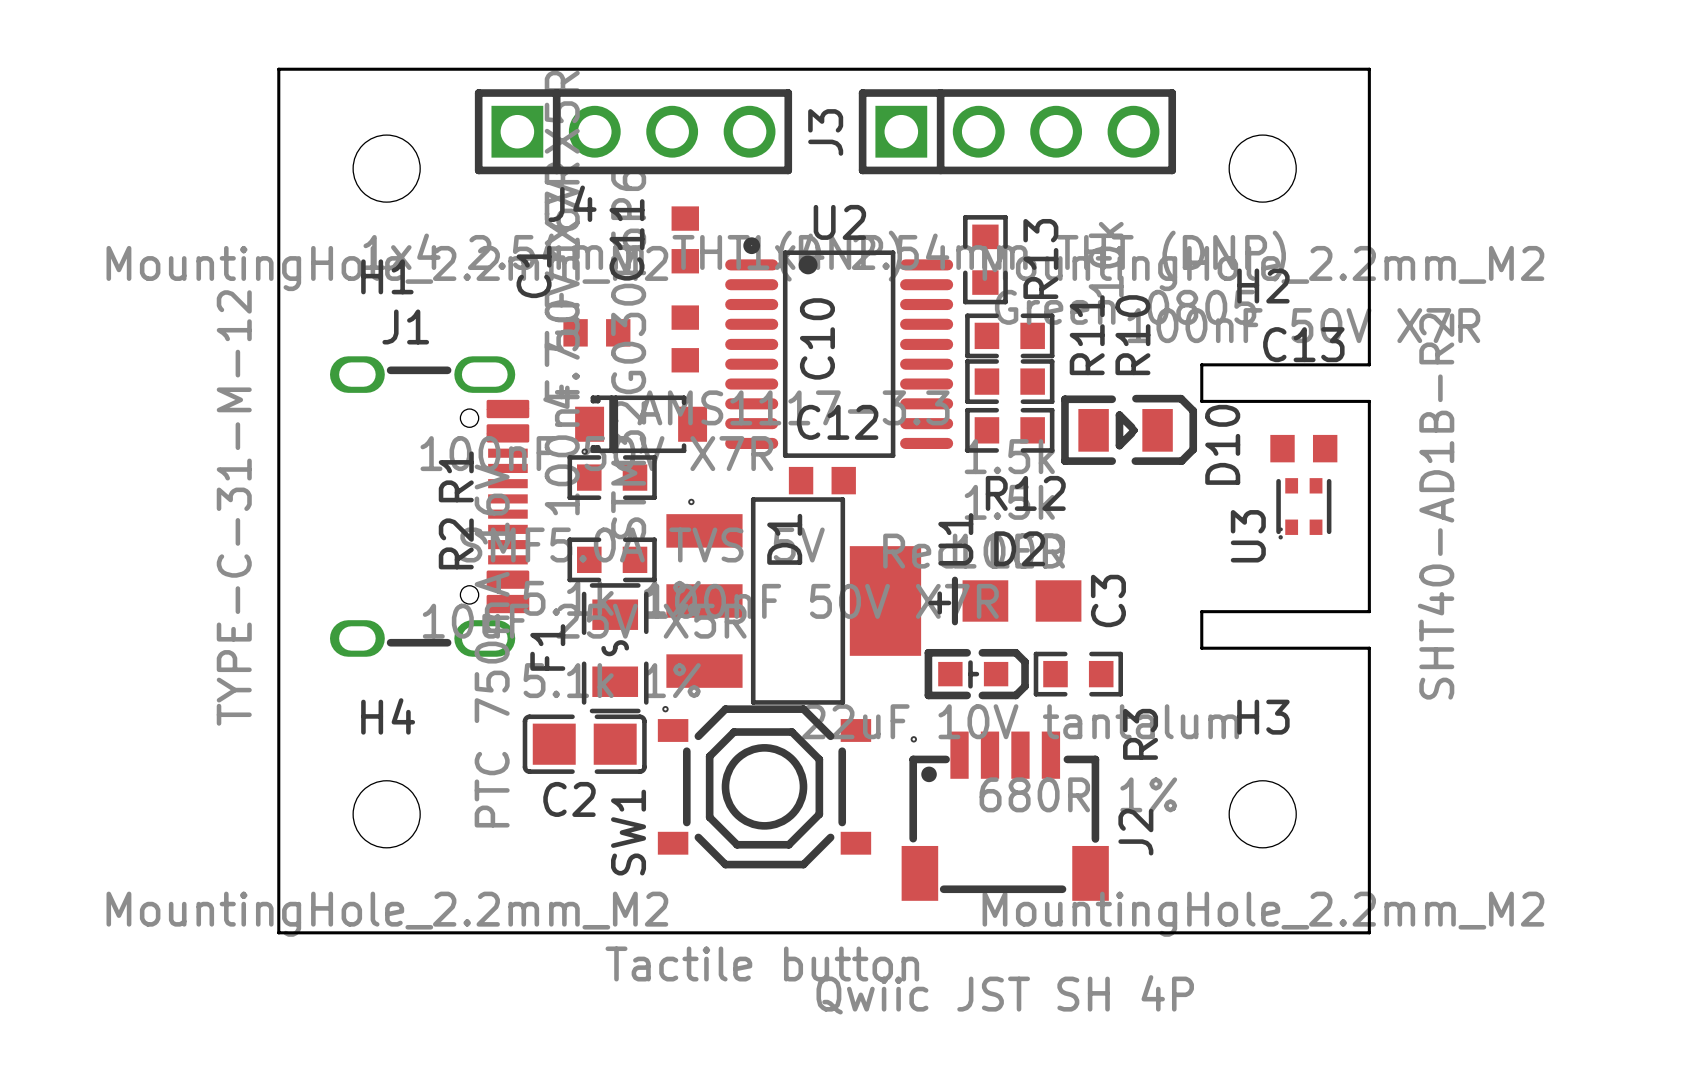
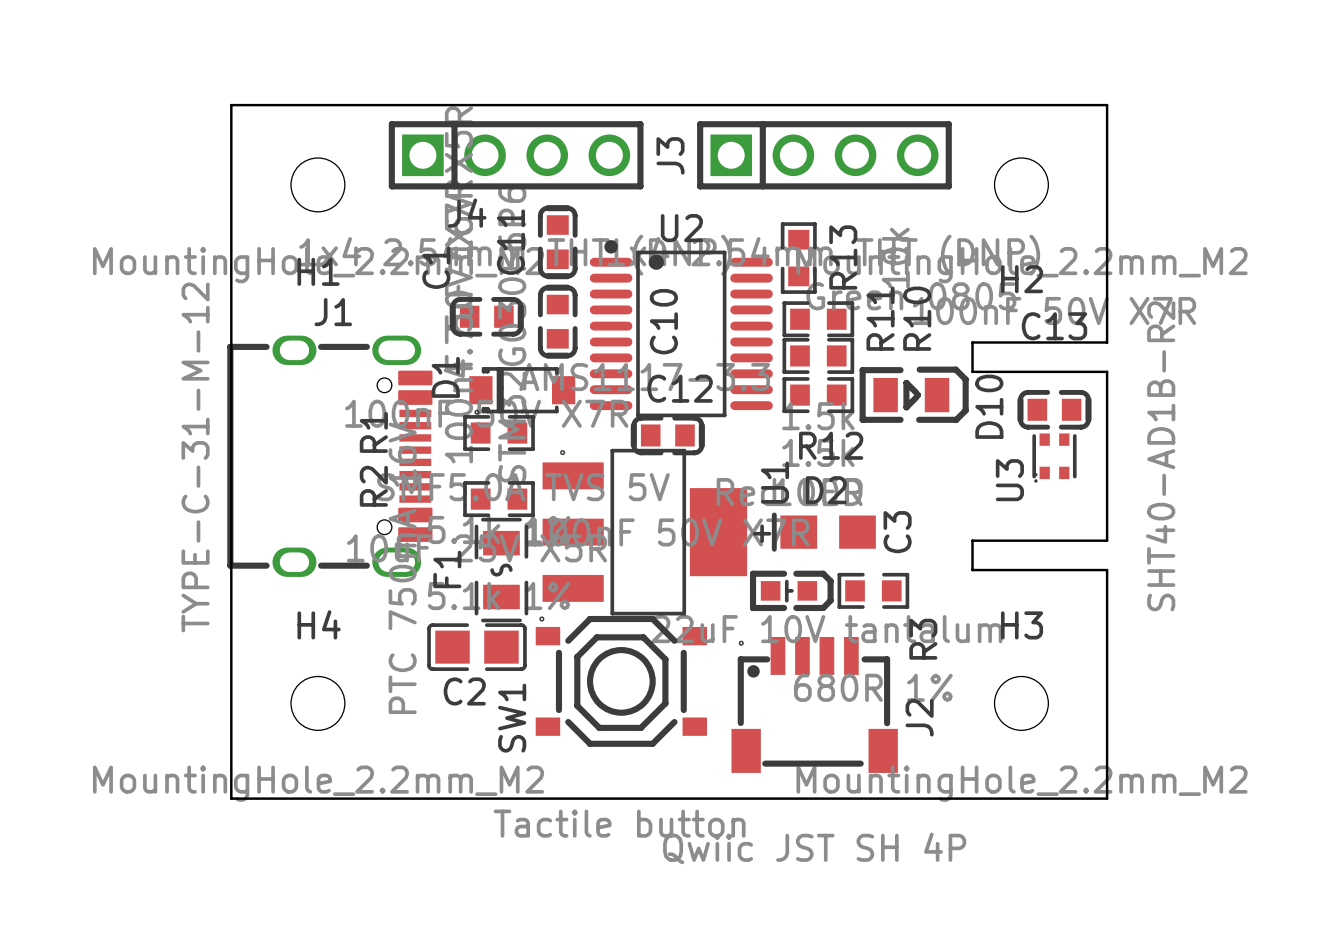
C11 footprint: [671, 206, 699, 274] -> [537, 205, 578, 280]
C10 footprint: [671, 305, 699, 373] -> [537, 284, 578, 359]
C1 footprint: [563, 319, 631, 347] -> [449, 296, 524, 337]
J1 footprint: [329, 356, 530, 657] -> [227, 335, 433, 577]
C13 footprint: [1270, 434, 1338, 463] -> [1017, 389, 1092, 430]
C12 footprint: [788, 466, 856, 495] -> [630, 415, 705, 456]
D1 name position: D1 (784, 539) -> D1 (445, 377)

